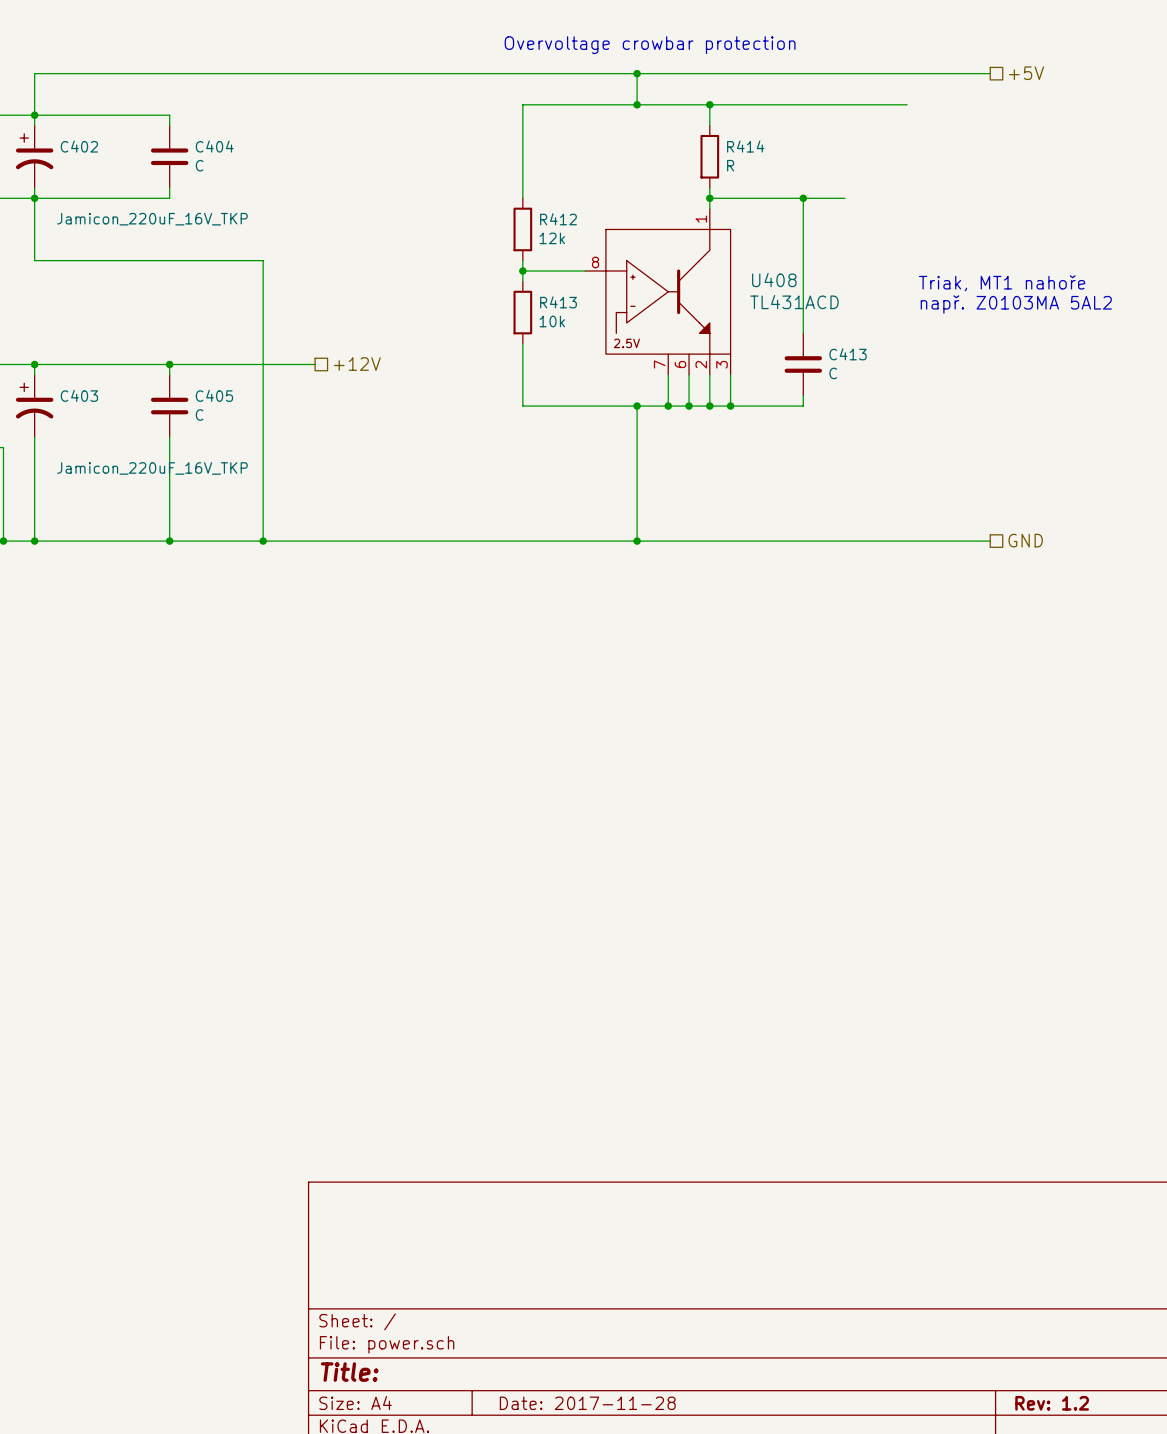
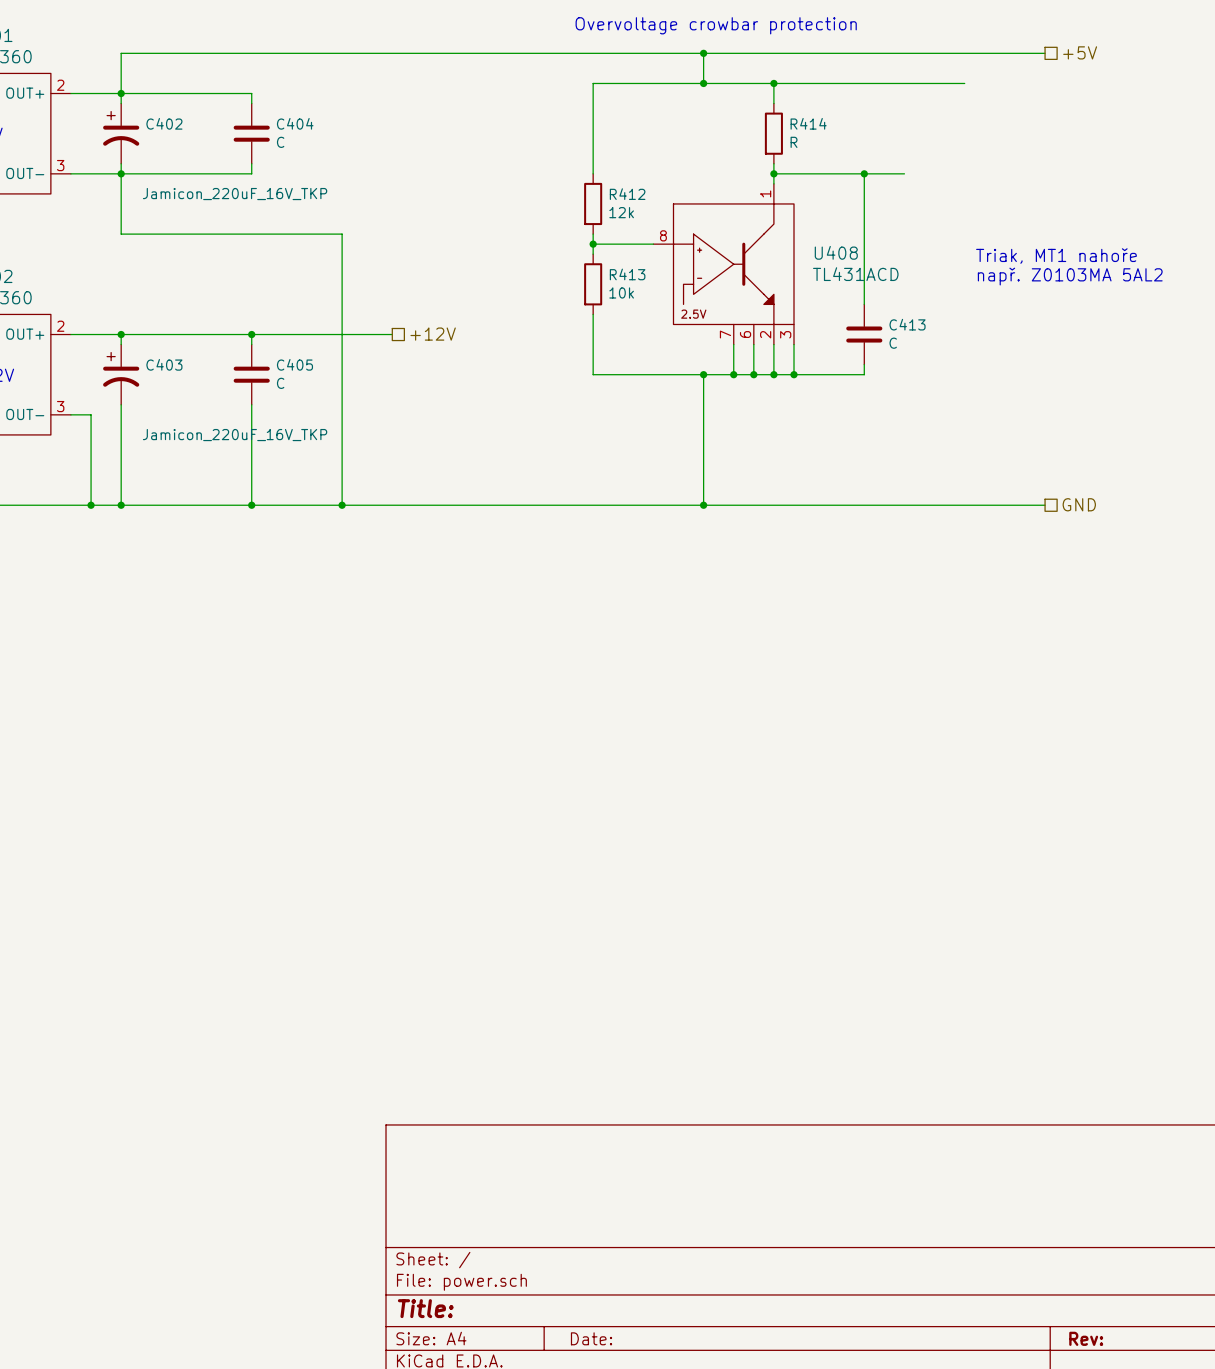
title block: Date: 2017-11-28 (587, 1403) -> Date: (591, 1338)
title block: Rev: 1.2 (1052, 1403) -> Rev: (1086, 1338)

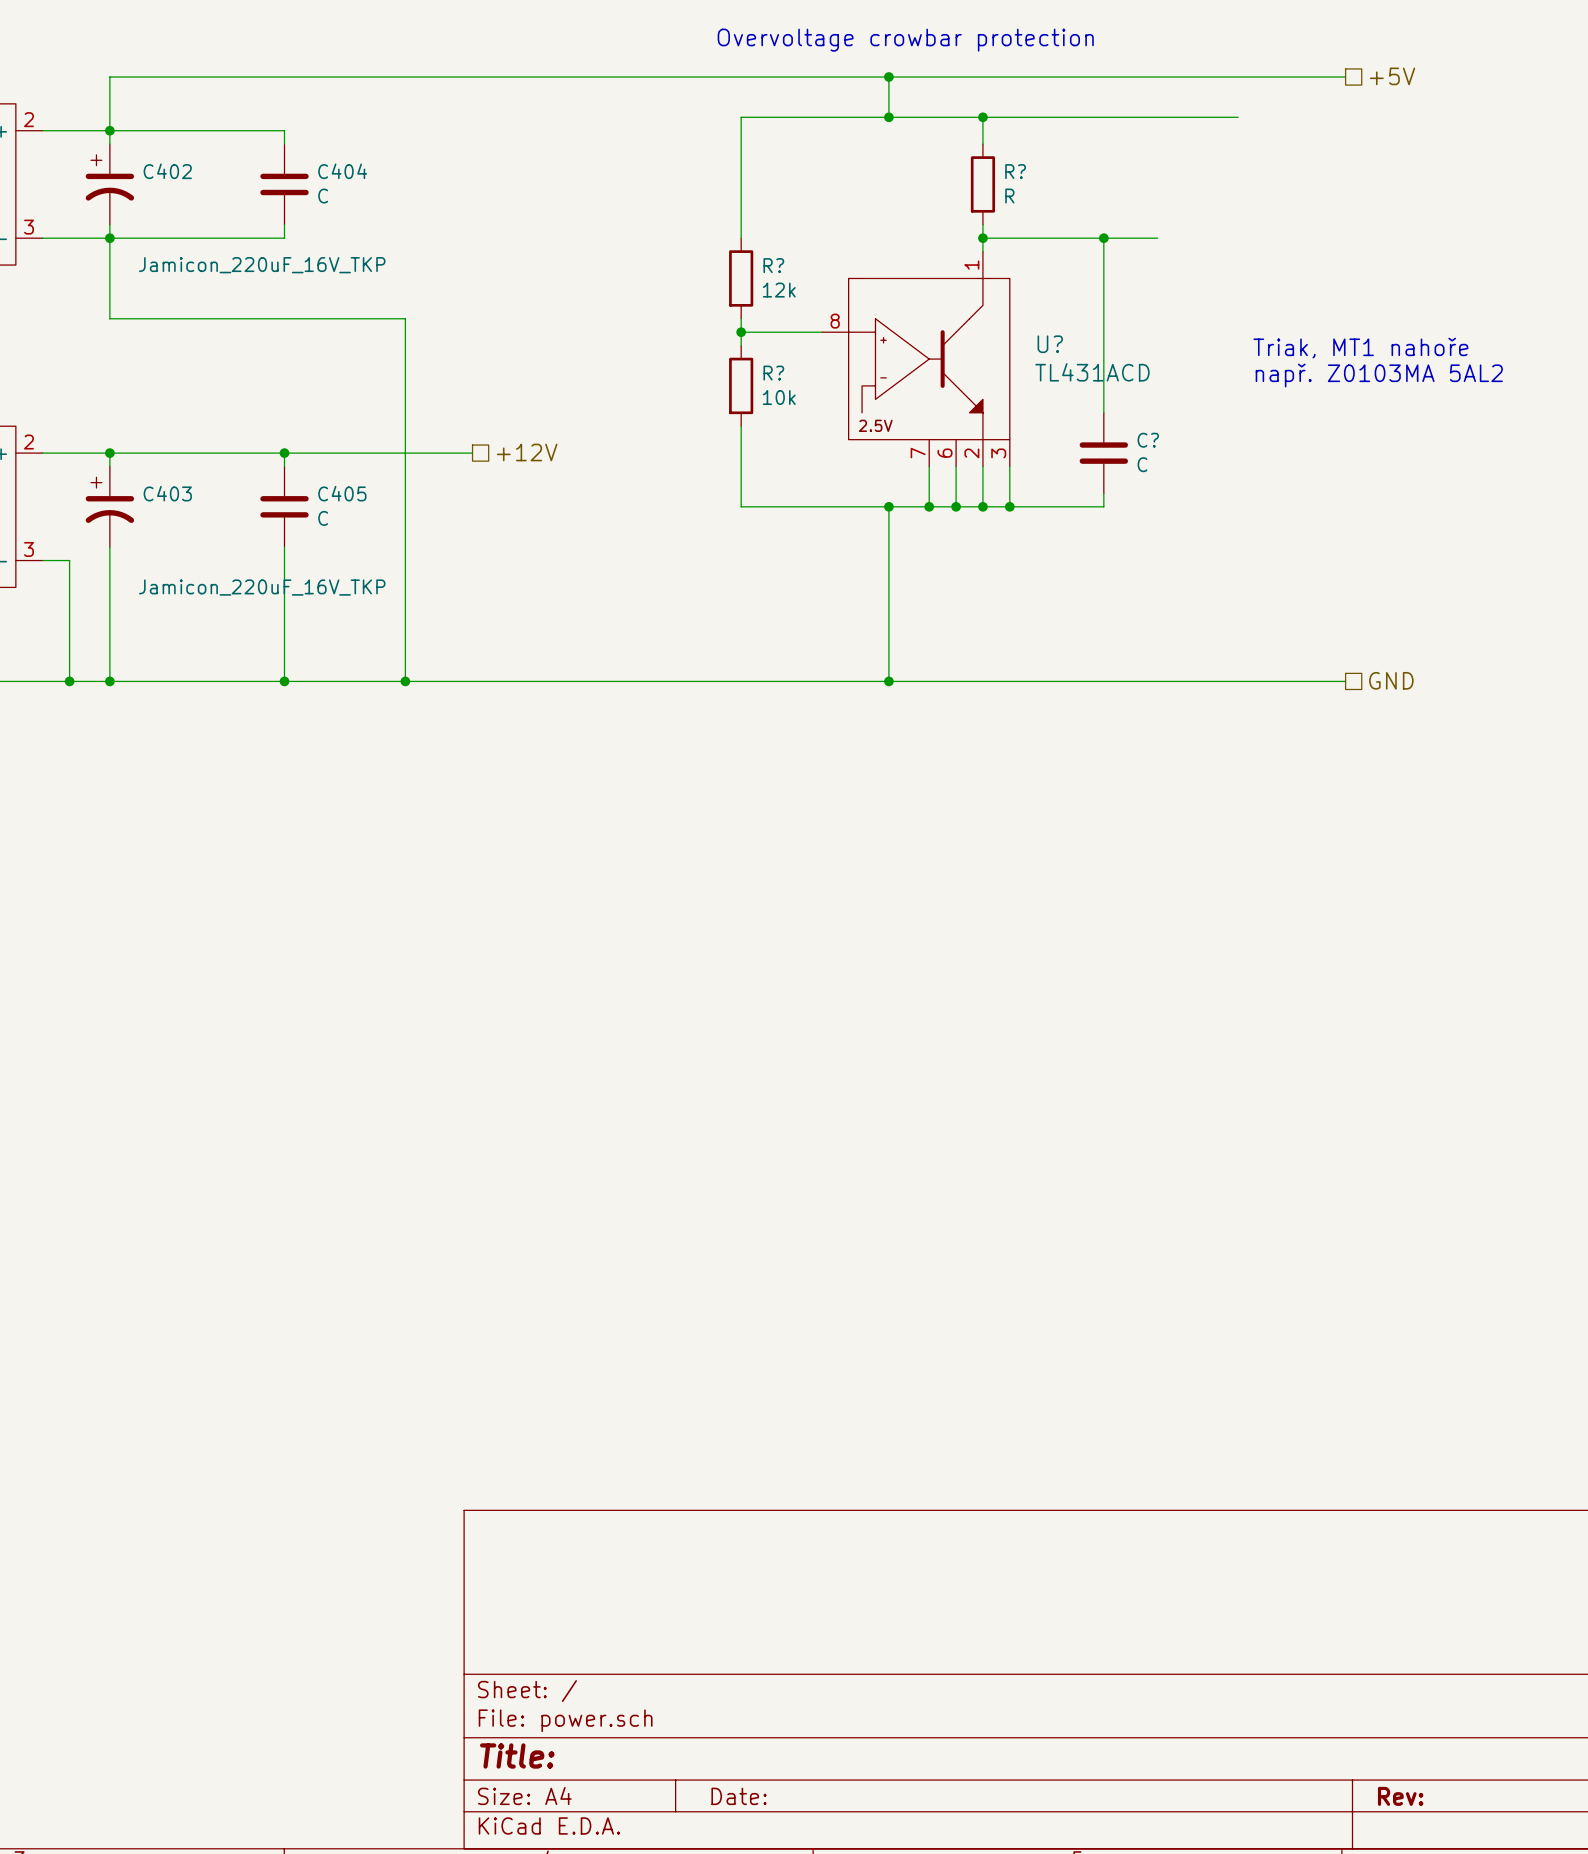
R414 name: R414 (808, 123) -> R? (1015, 171)
R412 name: R412 (627, 194) -> R? (773, 265)
U408 name: U408 (836, 252) -> U? (1050, 344)
R413 name: R413 (627, 274) -> R? (773, 373)
C413 name: C413 (907, 324) -> C? (1148, 440)

